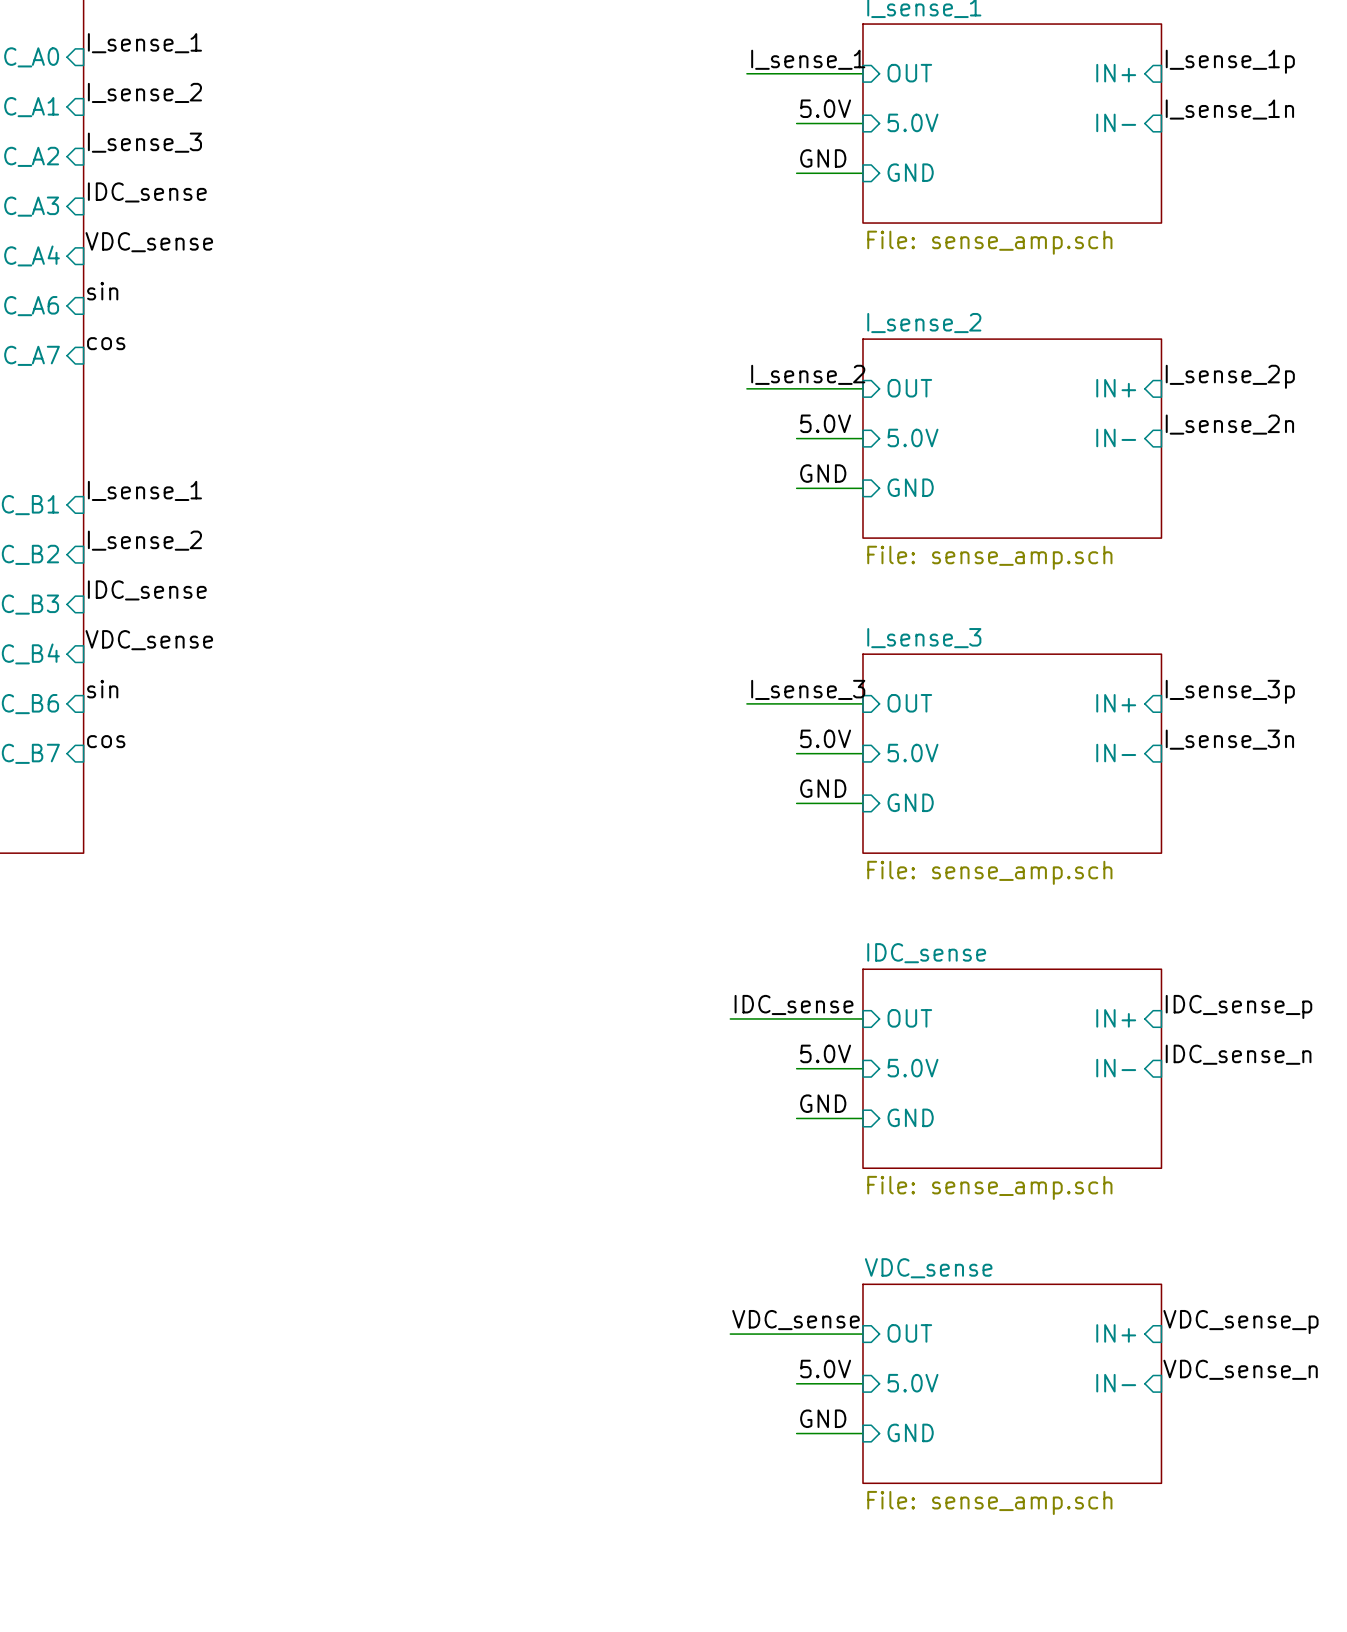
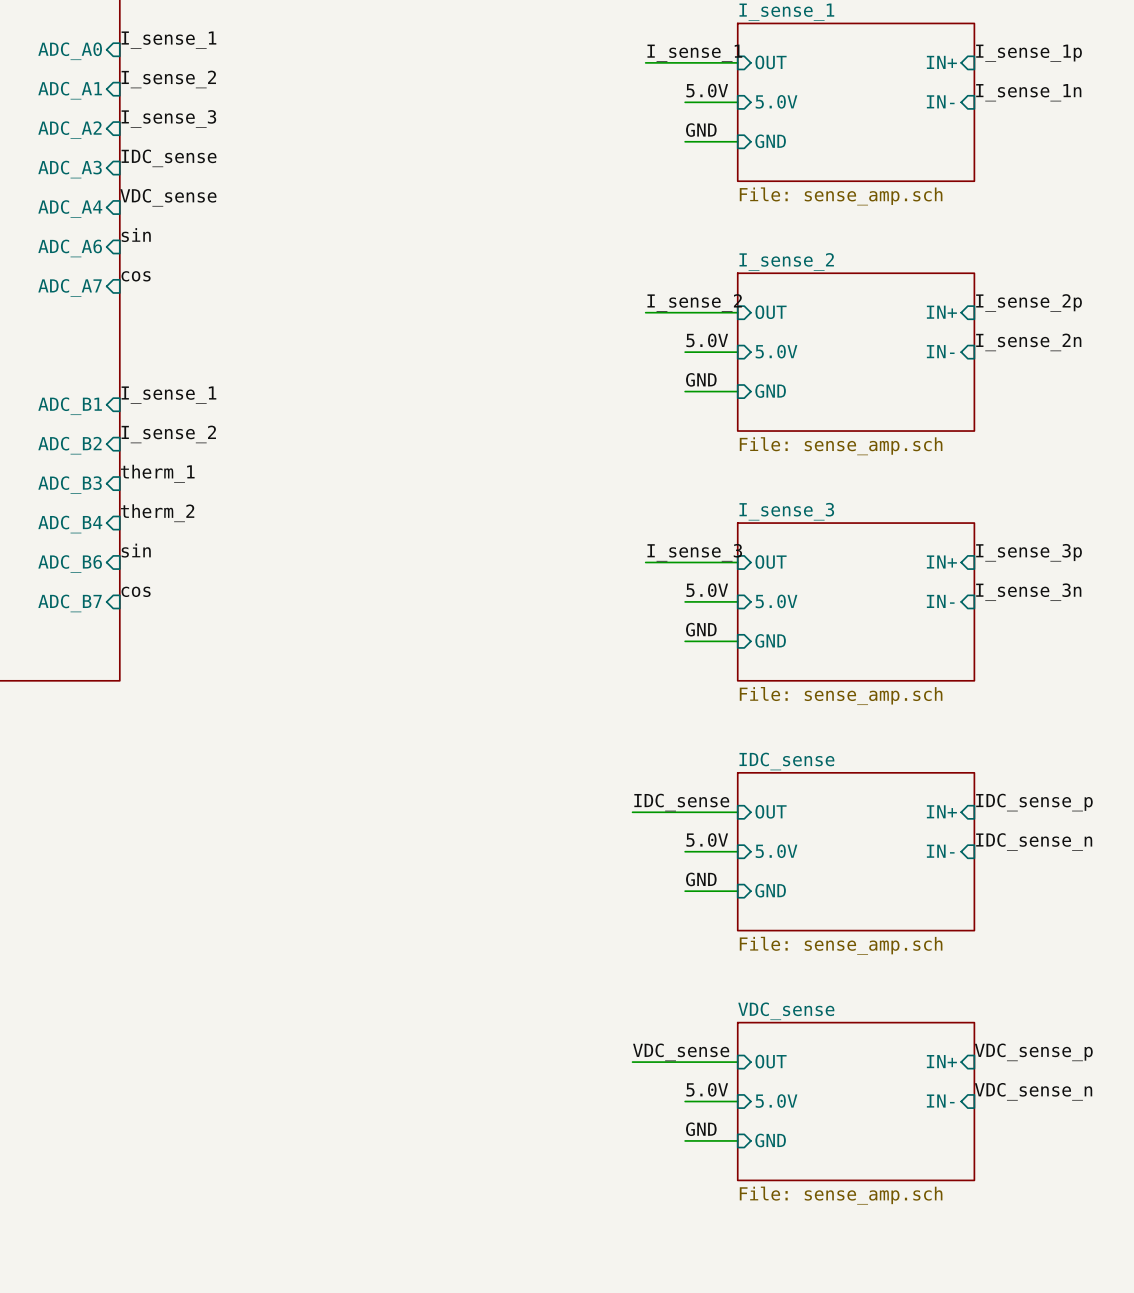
label: IDC_sense (147, 590) -> therm_1 (157, 473)
label: VDC_sense (149, 640) -> therm_2 (157, 513)

